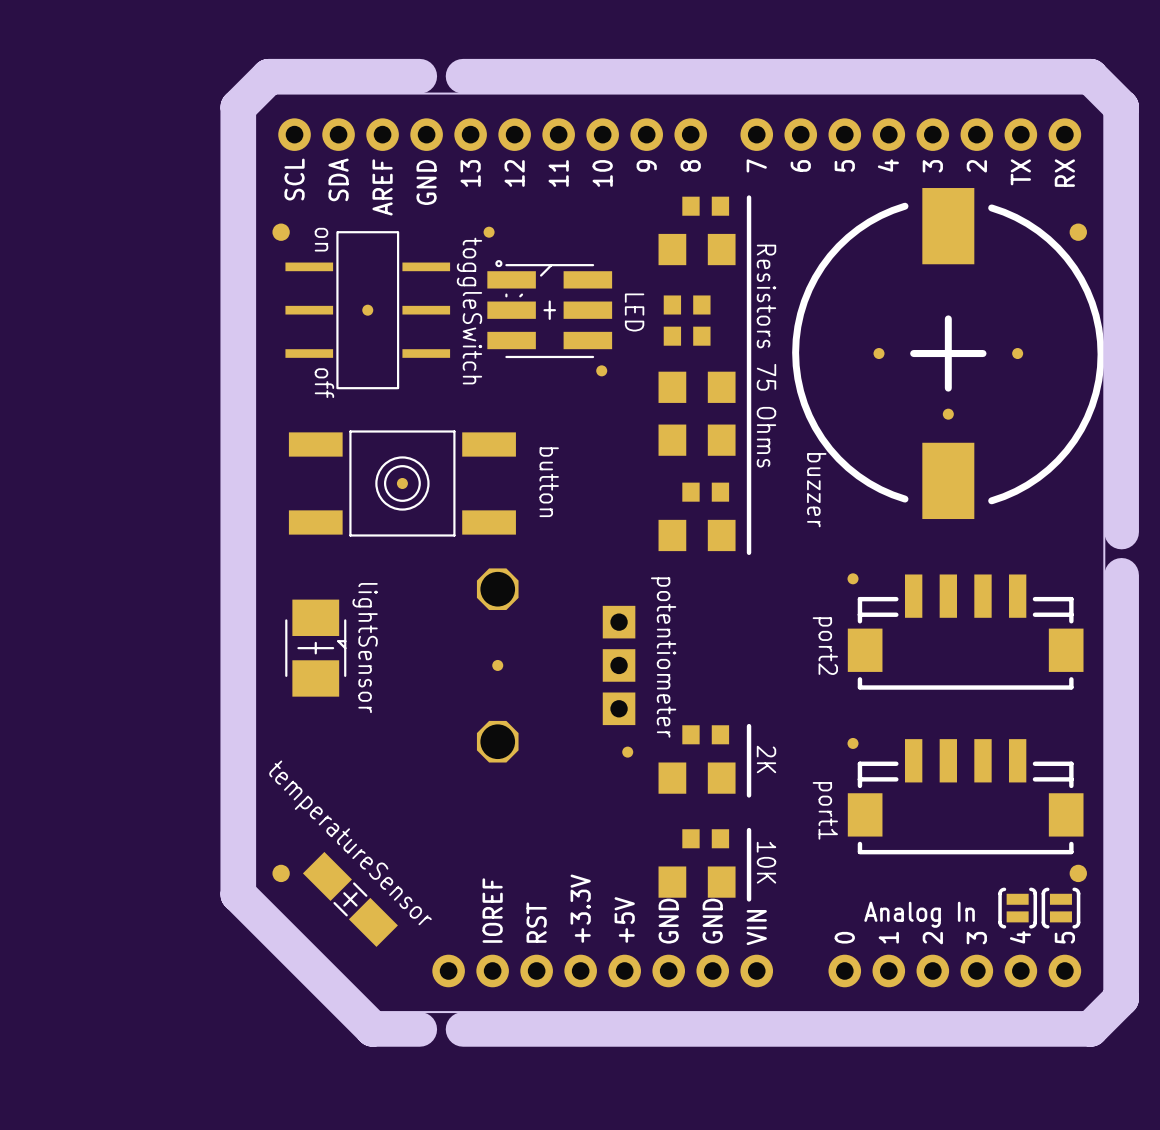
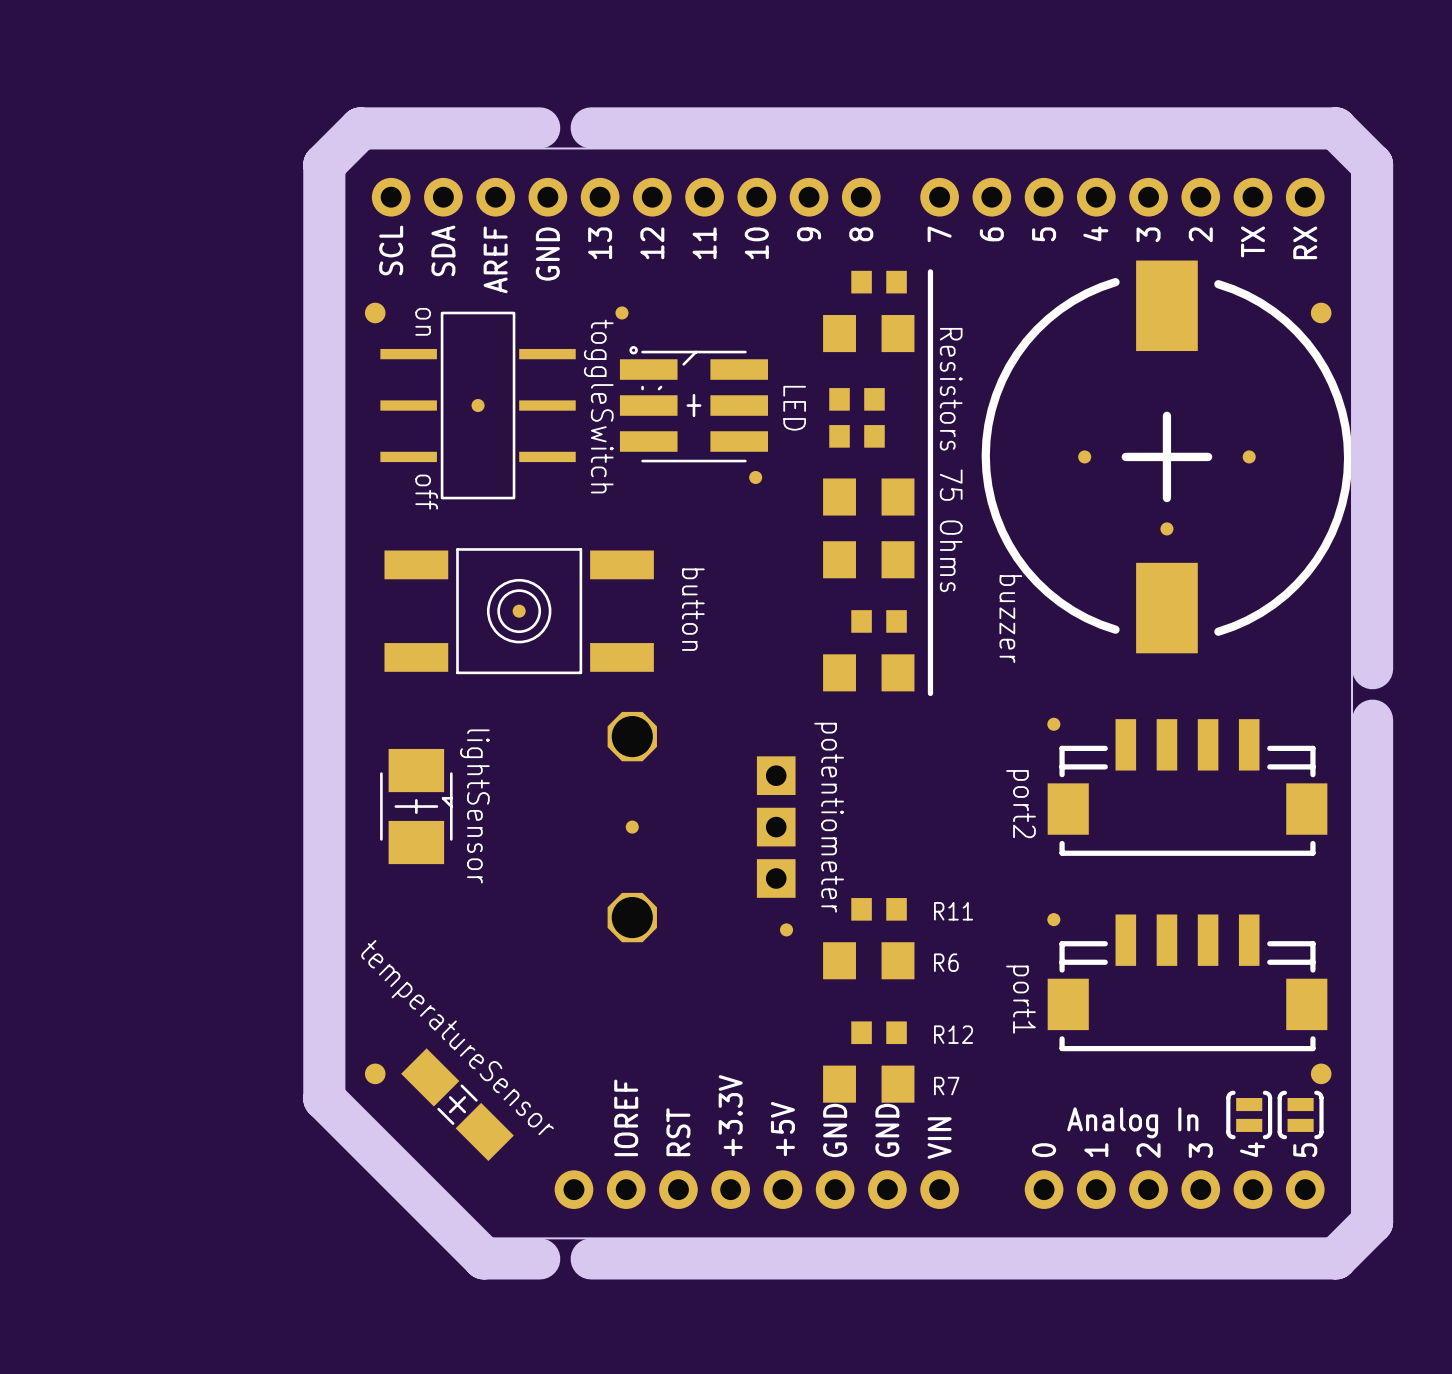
line: (749, 726) (749, 795) -> none
R11 name: none -> R11 (953, 911)
text: 2K (766, 759) -> none
R6 name: none -> R6 (946, 962)
line: (749, 830) (749, 899) -> none
R12 name: none -> R12 (953, 1034)
text: 10K (766, 862) -> none
R7 name: none -> R7 (946, 1086)

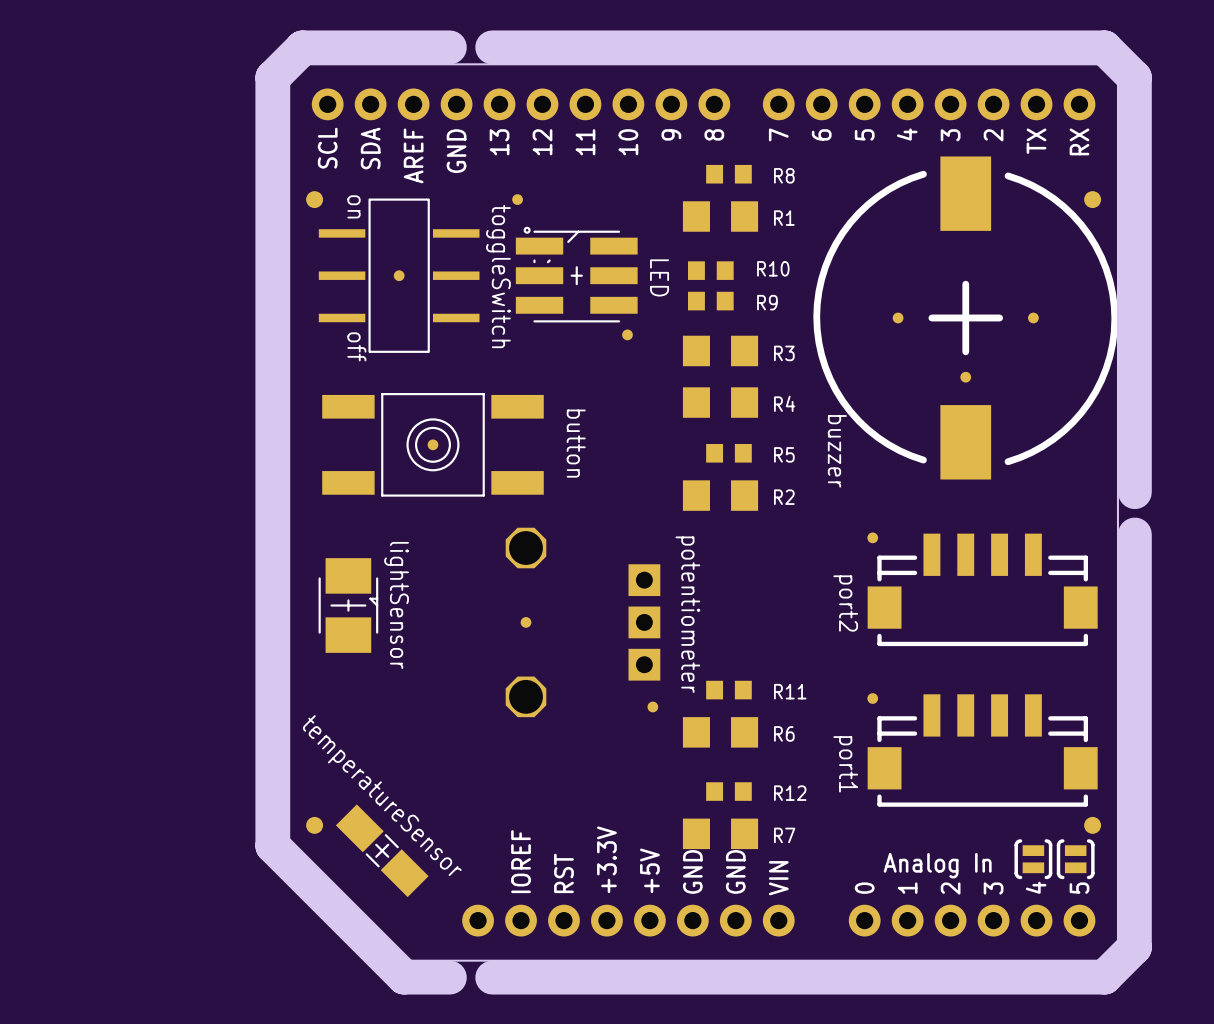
line: (930, 271) (930, 693) -> none
R8 name: none -> R8 (784, 175)
R1 name: none -> R1 (784, 218)
R10 name: none -> R10 (773, 268)
R9 name: none -> R9 (767, 302)
text: Resistors 75 Ohms (951, 460) -> none
R3 name: none -> R3 (784, 353)
R4 name: none -> R4 (784, 403)
R5 name: none -> R5 (784, 454)
R2 name: none -> R2 (784, 497)

